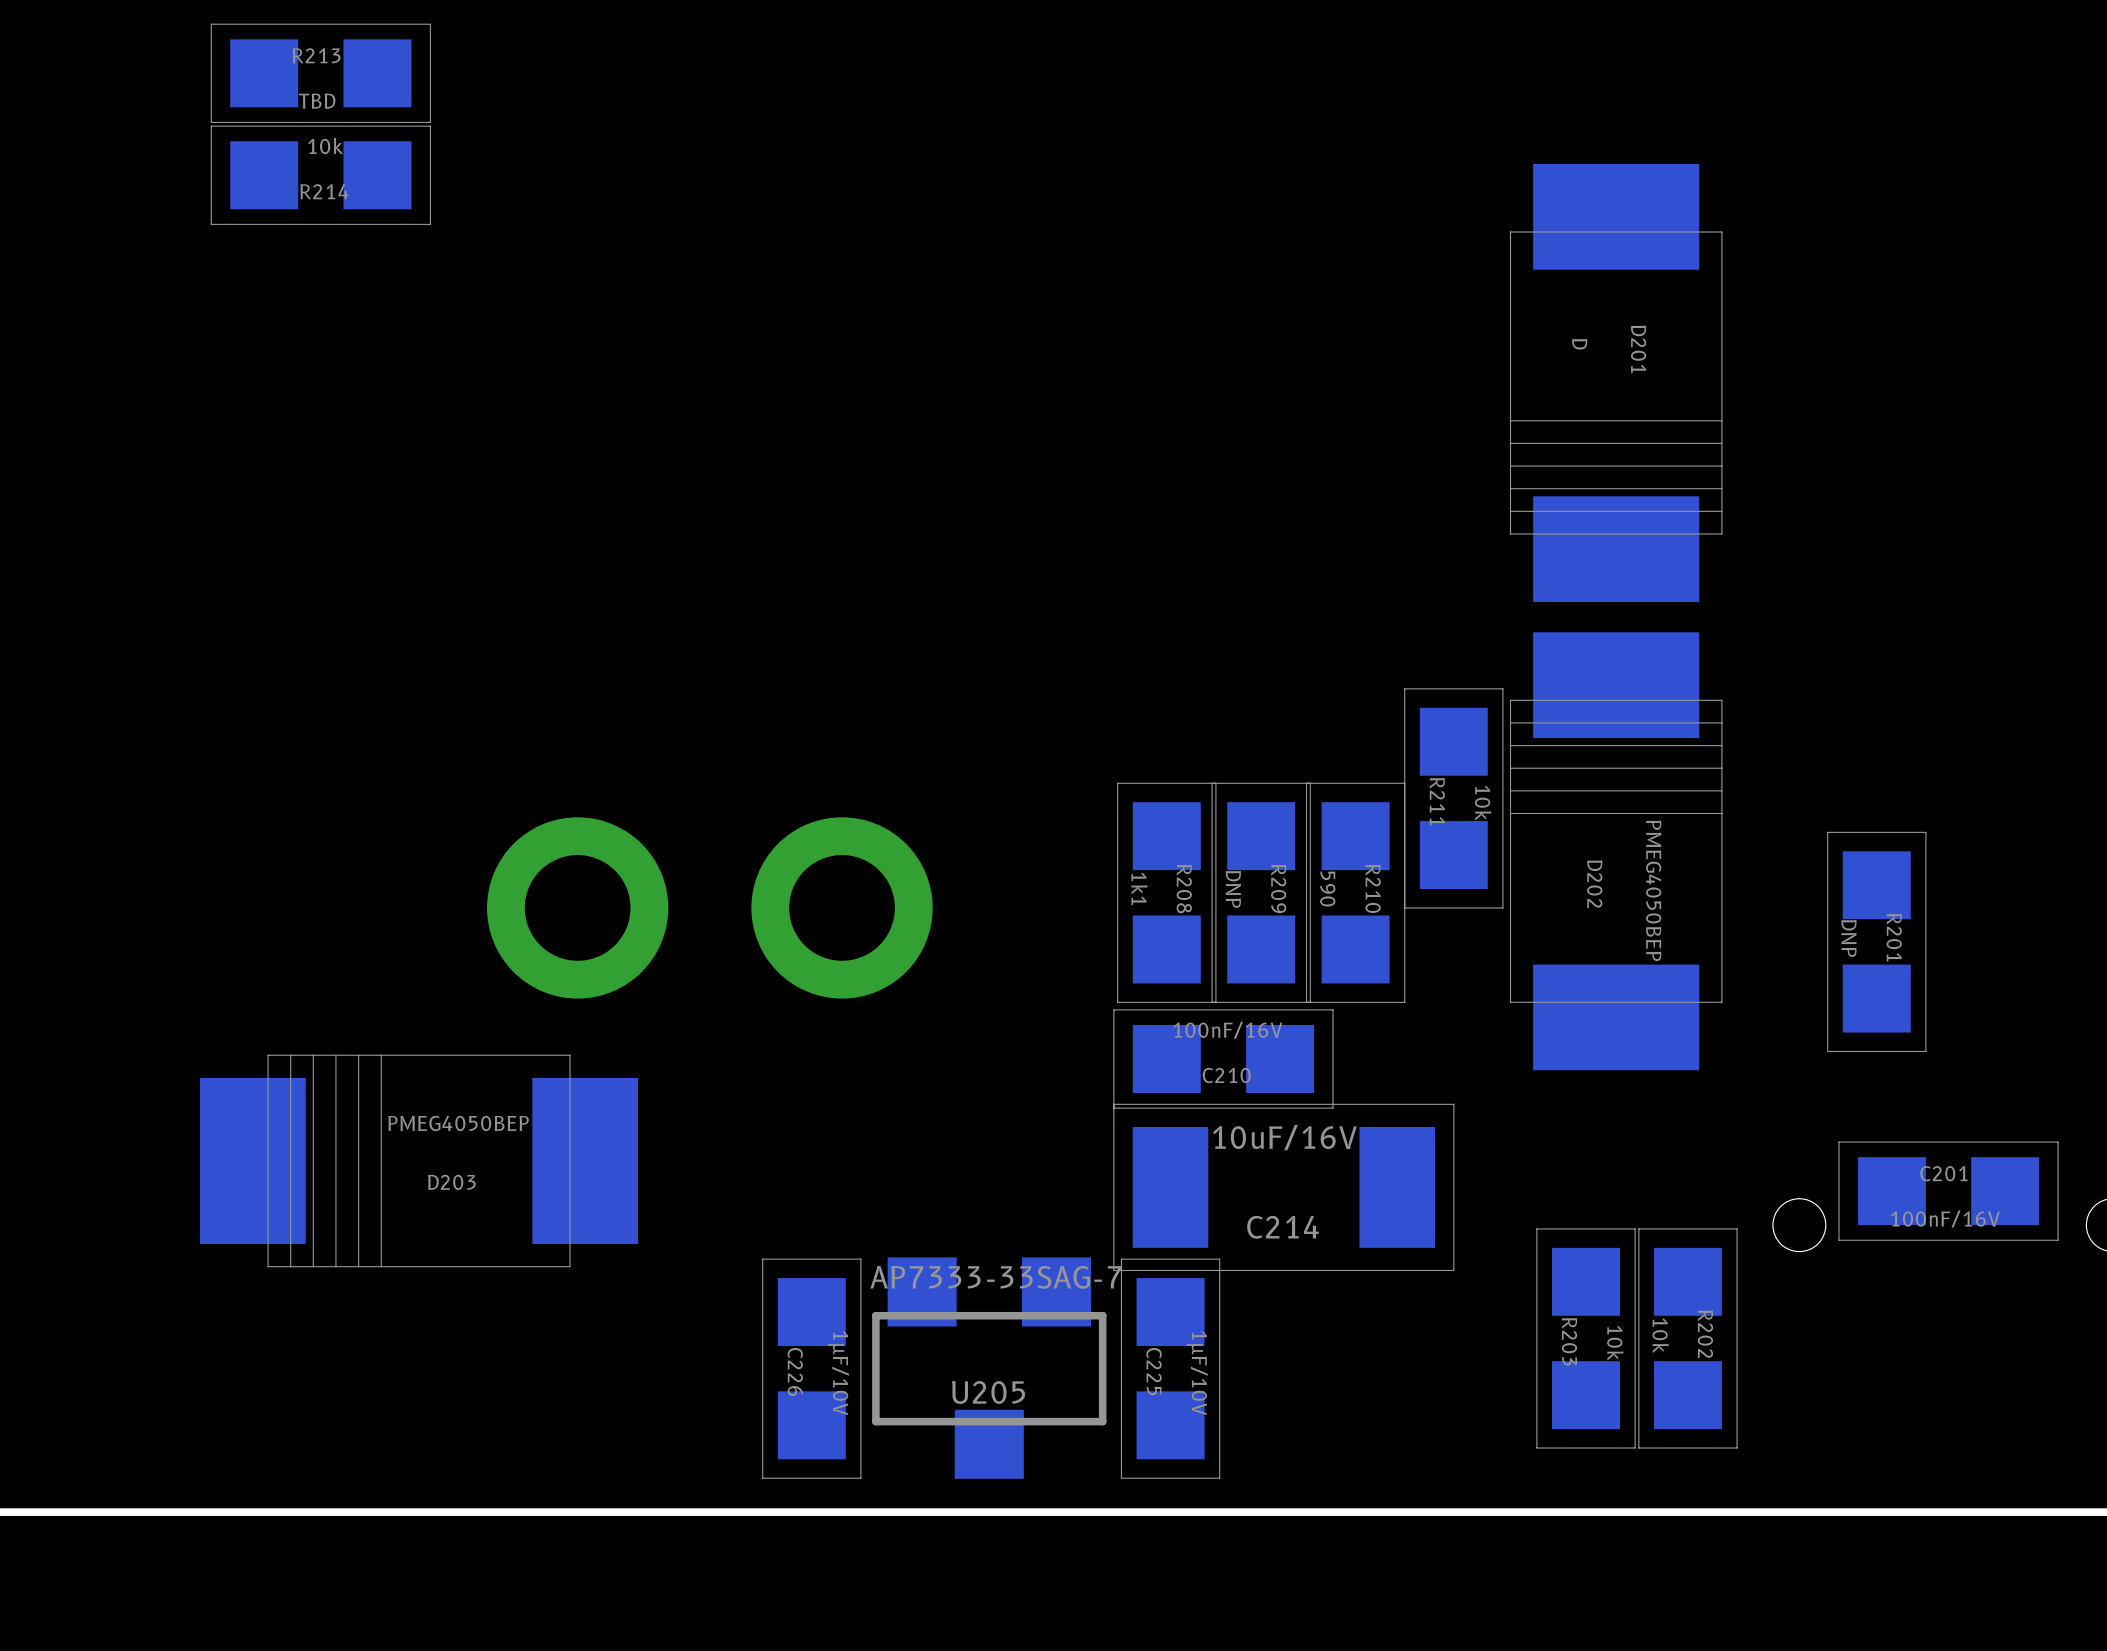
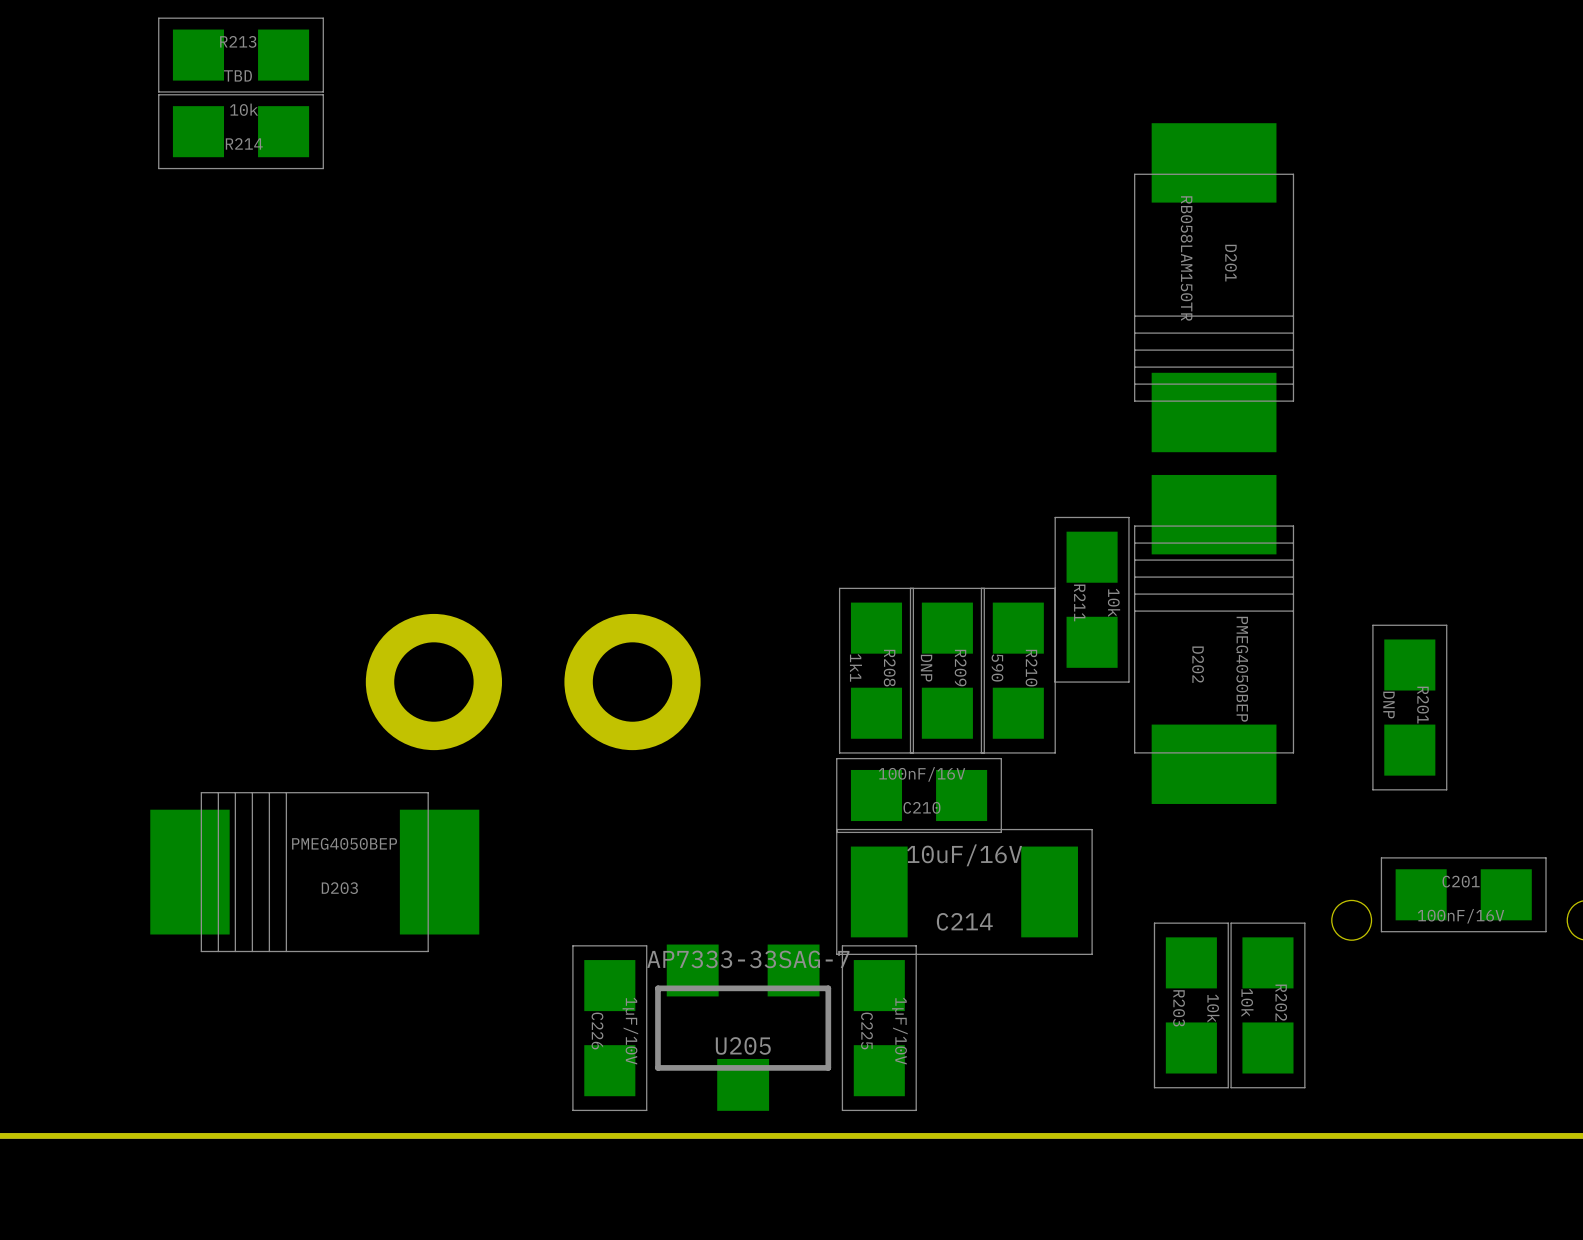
D201 value: D (1579, 344) -> RB058LAM150TR (1186, 258)

